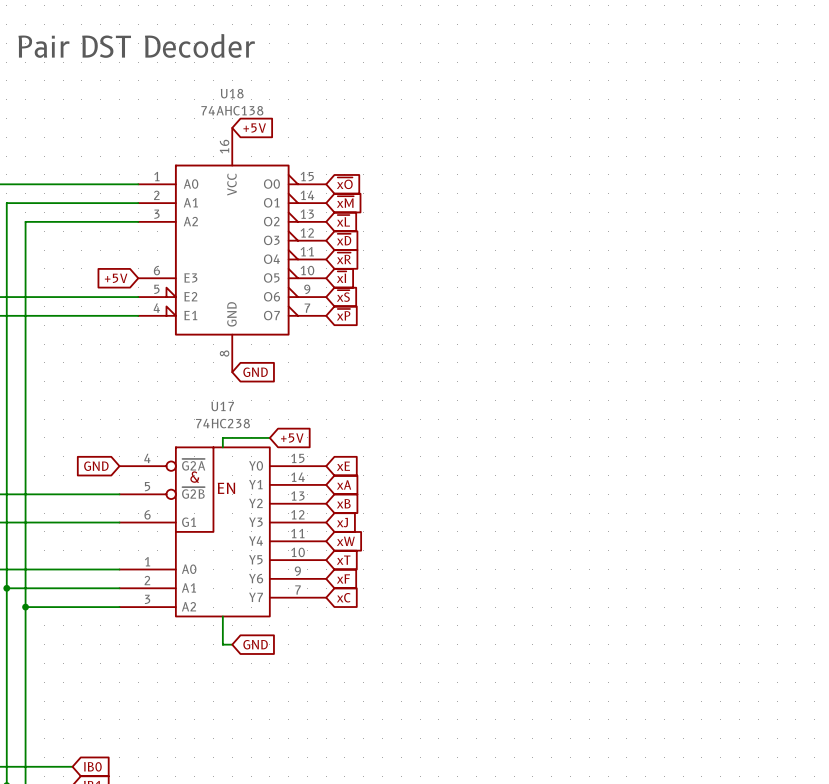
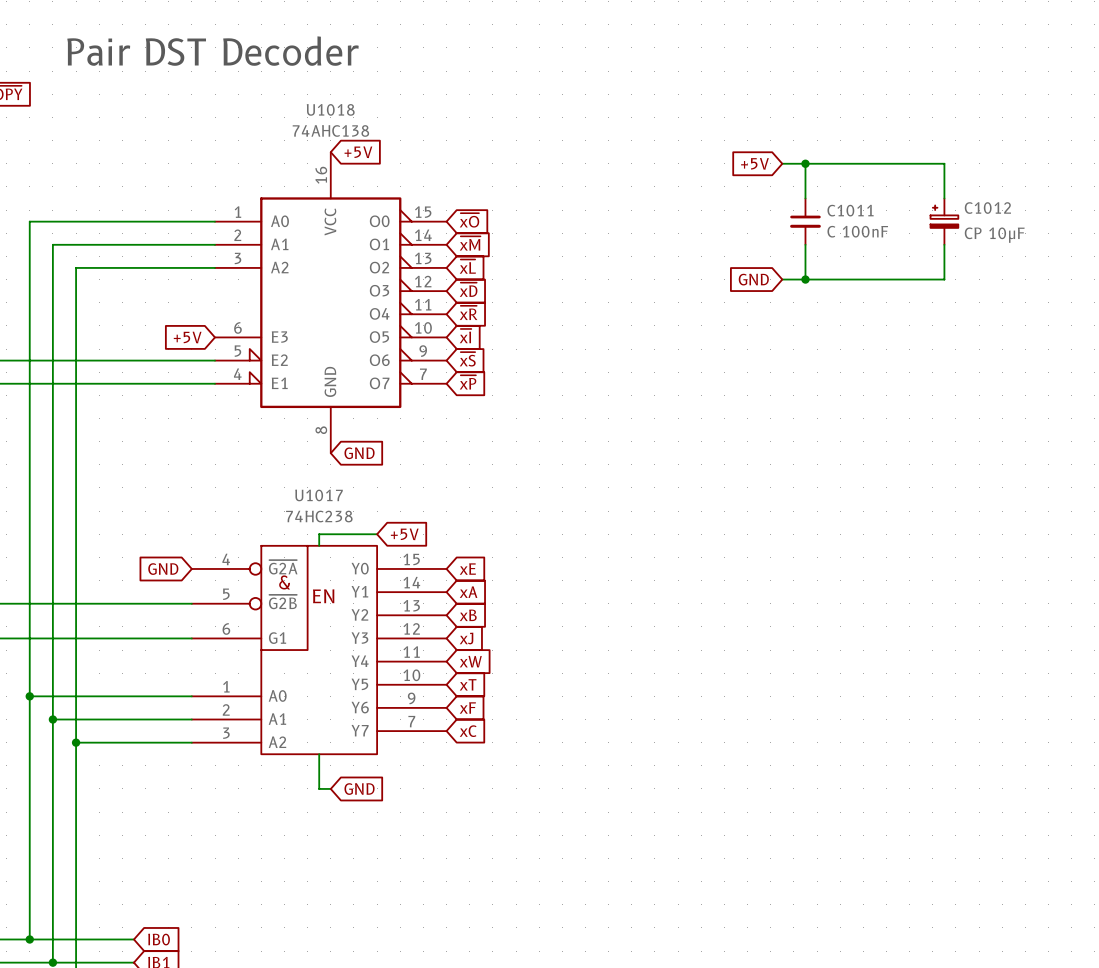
U18 name: U18 (232, 93) -> U1018 (330, 109)
global label: none -> +5V (754, 163)
wire: none -> (782, 163) (944, 163) (944, 198)
wire: none -> (805, 163) (805, 198)
junction: none -> (805, 163)
C1011: none -> C 100nF (805, 221)
C1012: none -> CP 10μF (944, 221)
wire: none -> (805, 244) (805, 279)
wire: none -> (944, 244) (944, 279) (782, 279)
global label: none -> GND (753, 279)
junction: none -> (805, 279)
U17 name: U17 (222, 406) -> U1017 (319, 495)

